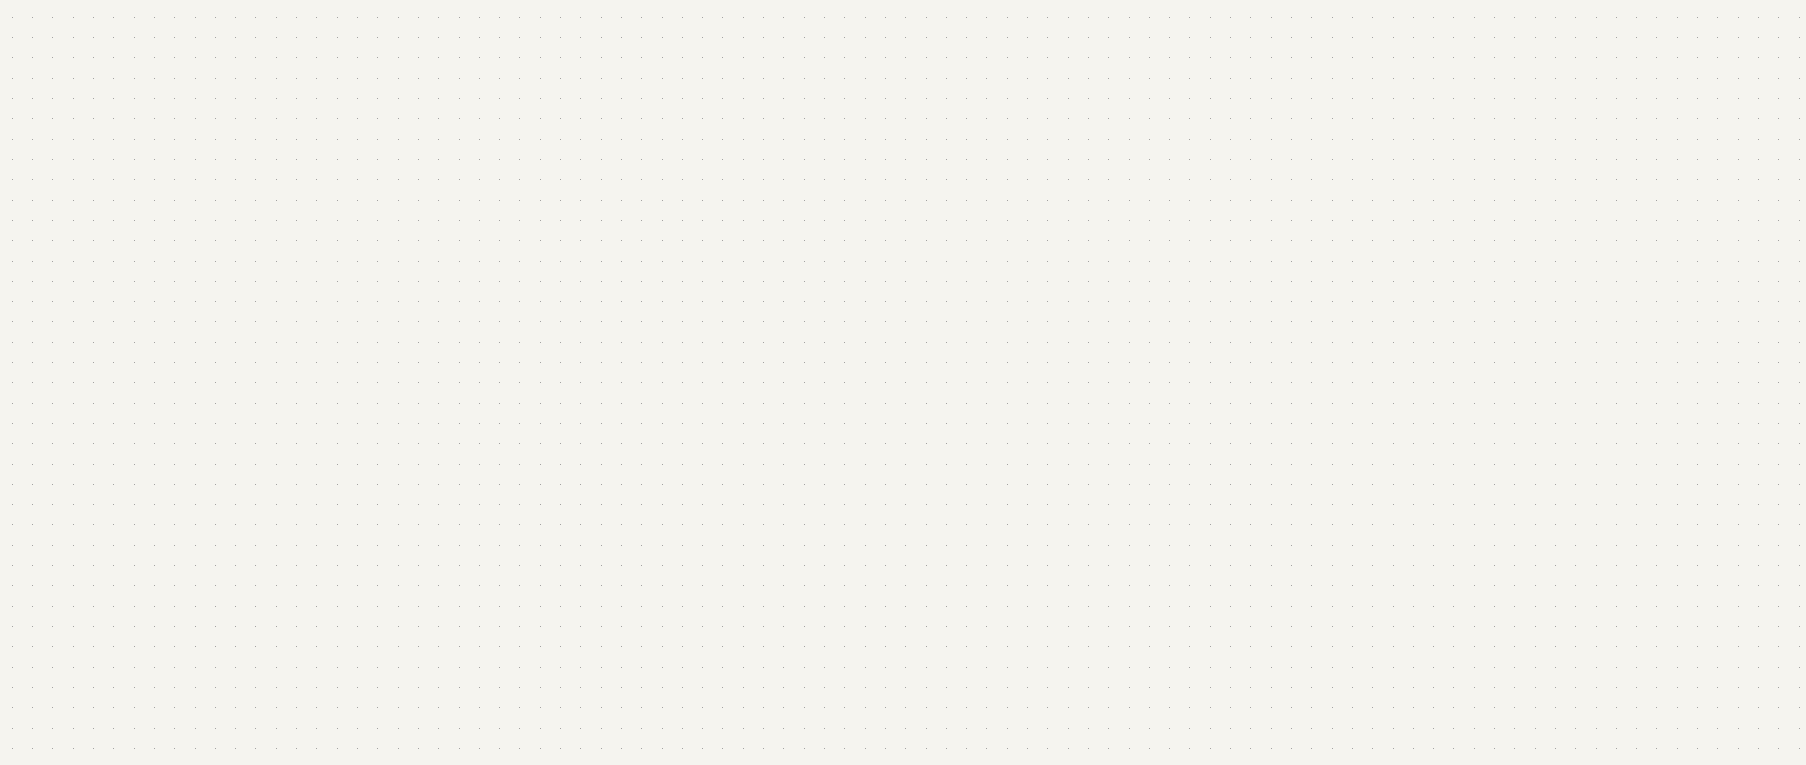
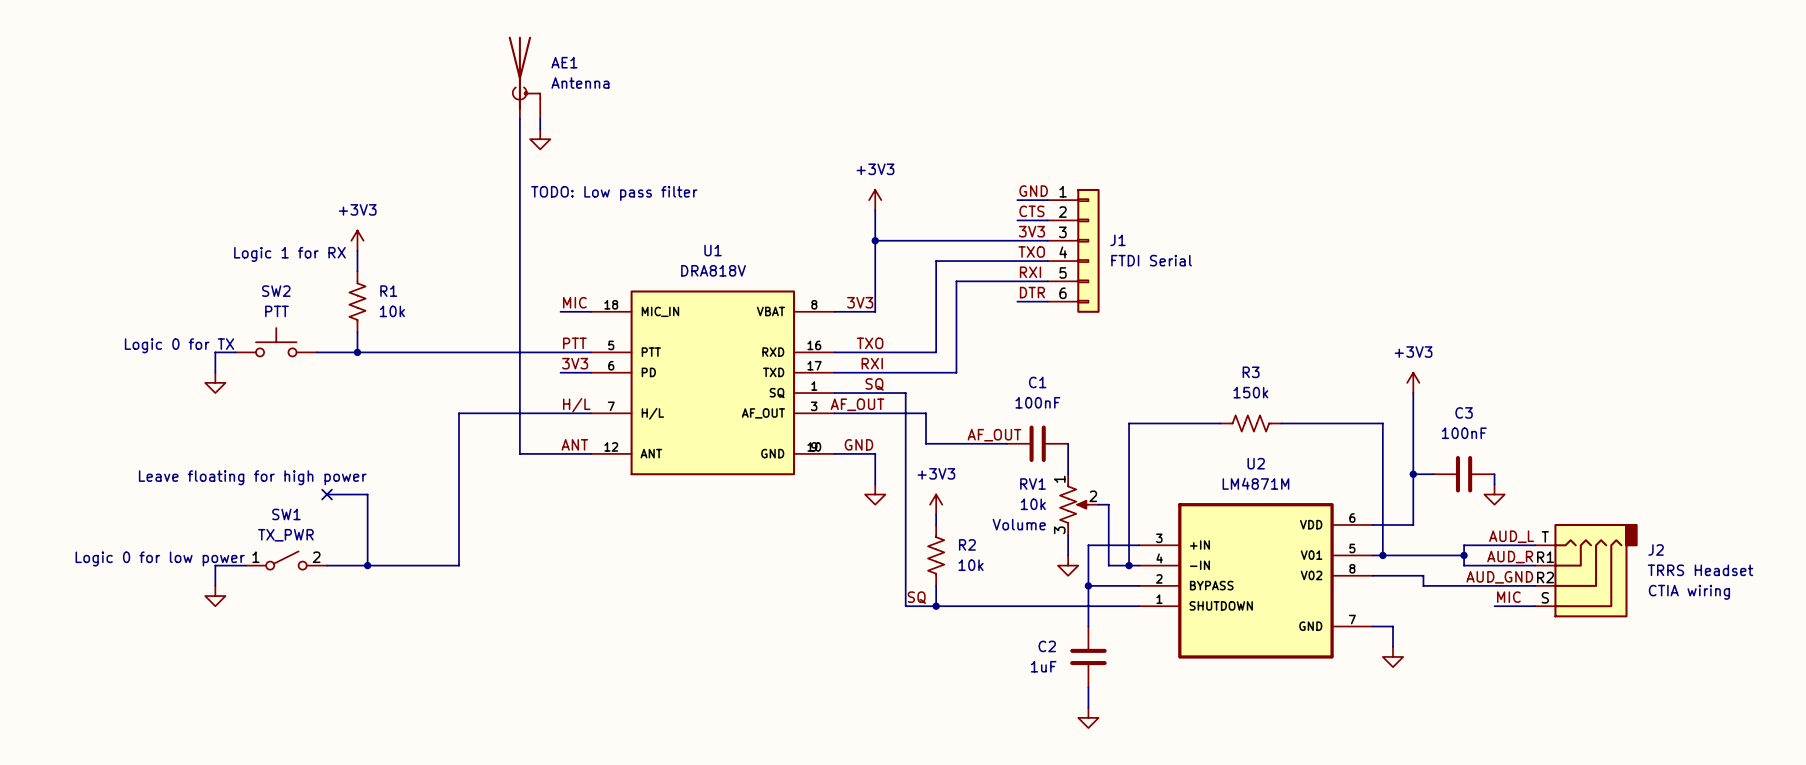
AE1: none -> Antenna (524, 77)
wire: none -> (519, 118) (519, 453) (590, 453)
wire: none -> (540, 118) (540, 129)
power symbol: none -> (540, 139)
label: none -> GND (1033, 191)
text: none -> TODO: Low pass filter (614, 193)
power symbol: none -> +3V3 (875, 200)
wire: none -> (1017, 200) (1047, 200)
wire: none -> (875, 210) (875, 311) (834, 311)
label: none -> CTS (1031, 211)
wire: none -> (1017, 220) (1047, 220)
label: none -> 3V3 (1031, 231)
power symbol: none -> +3V3 (357, 240)
wire: none -> (875, 240) (1047, 240)
junction: none -> (875, 240)
wire: none -> (357, 250) (357, 271)
J1: none -> FTDI Serial (1073, 250)
label: none -> TXO (1031, 251)
text: none -> Logic 1 for RX (289, 254)
wire: none -> (1047, 261) (936, 261) (936, 352) (834, 352)
label: none -> RXI (1030, 272)
wire: none -> (1047, 281) (956, 281) (956, 372) (834, 372)
label: none -> DTR (1032, 292)
R1: none -> 10k (357, 301)
wire: none -> (1017, 301) (1047, 301)
label: none -> MIC (574, 302)
label: none -> 3V3 (860, 302)
wire: none -> (560, 311) (590, 311)
wire: none -> (357, 332) (357, 352)
SW2: none -> PTT (276, 342)
label: none -> PTT (574, 343)
label: none -> TXO (870, 343)
text: none -> Logic 0 for TX (179, 345)
wire: none -> (235, 352) (215, 352) (215, 372)
wire: none -> (316, 352) (590, 352)
junction: none -> (357, 352)
label: none -> 3V3 (575, 363)
label: none -> RXI (872, 363)
wire: none -> (560, 372) (590, 372)
power symbol: none -> (215, 382)
U1: none -> DRA818V (712, 382)
power symbol: none -> +3V3 (1413, 382)
label: none -> SQ (874, 384)
wire: none -> (834, 393) (905, 393) (905, 606) (1139, 606)
wire: none -> (1413, 393) (1413, 524) (1372, 524)
label: none -> H/L (576, 405)
label: none -> AF_OUT (857, 404)
wire: none -> (590, 413) (459, 413) (459, 565) (327, 565)
wire: none -> (834, 413) (926, 413) (926, 443) (1007, 443)
wire: none -> (1220, 423) (1129, 423) (1129, 565)
R3: none -> 150k (1250, 423)
wire: none -> (1281, 423) (1382, 423) (1382, 555)
label: none -> AF_OUT (994, 435)
C1: none -> 100nF (1037, 443)
wire: none -> (1068, 443) (1068, 474)
label: none -> ANT (574, 444)
label: none -> GND (858, 444)
wire: none -> (834, 453) (875, 453) (875, 484)
wire: none -> (1413, 474) (1433, 474)
junction: none -> (1413, 474)
C3: none -> 100nF (1464, 474)
wire: none -> (1494, 474) (1494, 484)
text: none -> Leave floating for high power (252, 477)
wire: none -> (327, 494) (367, 494) (367, 565)
no-connect mark: none -> (327, 494)
power symbol: none -> (875, 494)
power symbol: none -> (1494, 494)
power symbol: none -> +3V3 (936, 504)
RV1: none -> 10k (1079, 504)
wire: none -> (1098, 504) (1108, 504) (1108, 565) (1139, 565)
wire: none -> (936, 514) (936, 524)
wire: none -> (1068, 535) (1068, 555)
label: none -> AUD_L (1511, 536)
wire: none -> (1139, 545) (1088, 545) (1088, 626)
wire: none -> (1535, 545) (1464, 545) (1464, 565) (1535, 565)
R2: none -> 10k (936, 555)
wire: none -> (1372, 555) (1464, 555)
junction: none -> (1382, 555)
junction: none -> (1464, 555)
label: none -> AUD_R (1510, 557)
text: none -> Logic 0 for low power (160, 558)
SW1: none -> TX_PWR (286, 560)
wire: none -> (245, 565) (215, 565) (215, 585)
junction: none -> (367, 565)
power symbol: none -> (1068, 565)
junction: none -> (1129, 565)
J2: none -> TRRS Headset (1586, 570)
wire: none -> (1372, 575) (1423, 575) (1423, 585) (1535, 585)
label: none -> AUD_GND (1499, 577)
U2: none -> LM4871M (1255, 580)
wire: none -> (936, 585) (936, 606)
wire: none -> (1088, 585) (1139, 585)
junction: none -> (1088, 585)
power symbol: none -> (215, 596)
label: none -> MIC (1508, 597)
label: none -> SQ (916, 597)
junction: none -> (936, 606)
wire: none -> (1494, 606) (1535, 606)
wire: none -> (1372, 626) (1393, 626) (1393, 646)
C2: none -> 1uF (1088, 656)
power symbol: none -> (1393, 656)
wire: none -> (1088, 687) (1088, 707)
power symbol: none -> (1088, 717)

